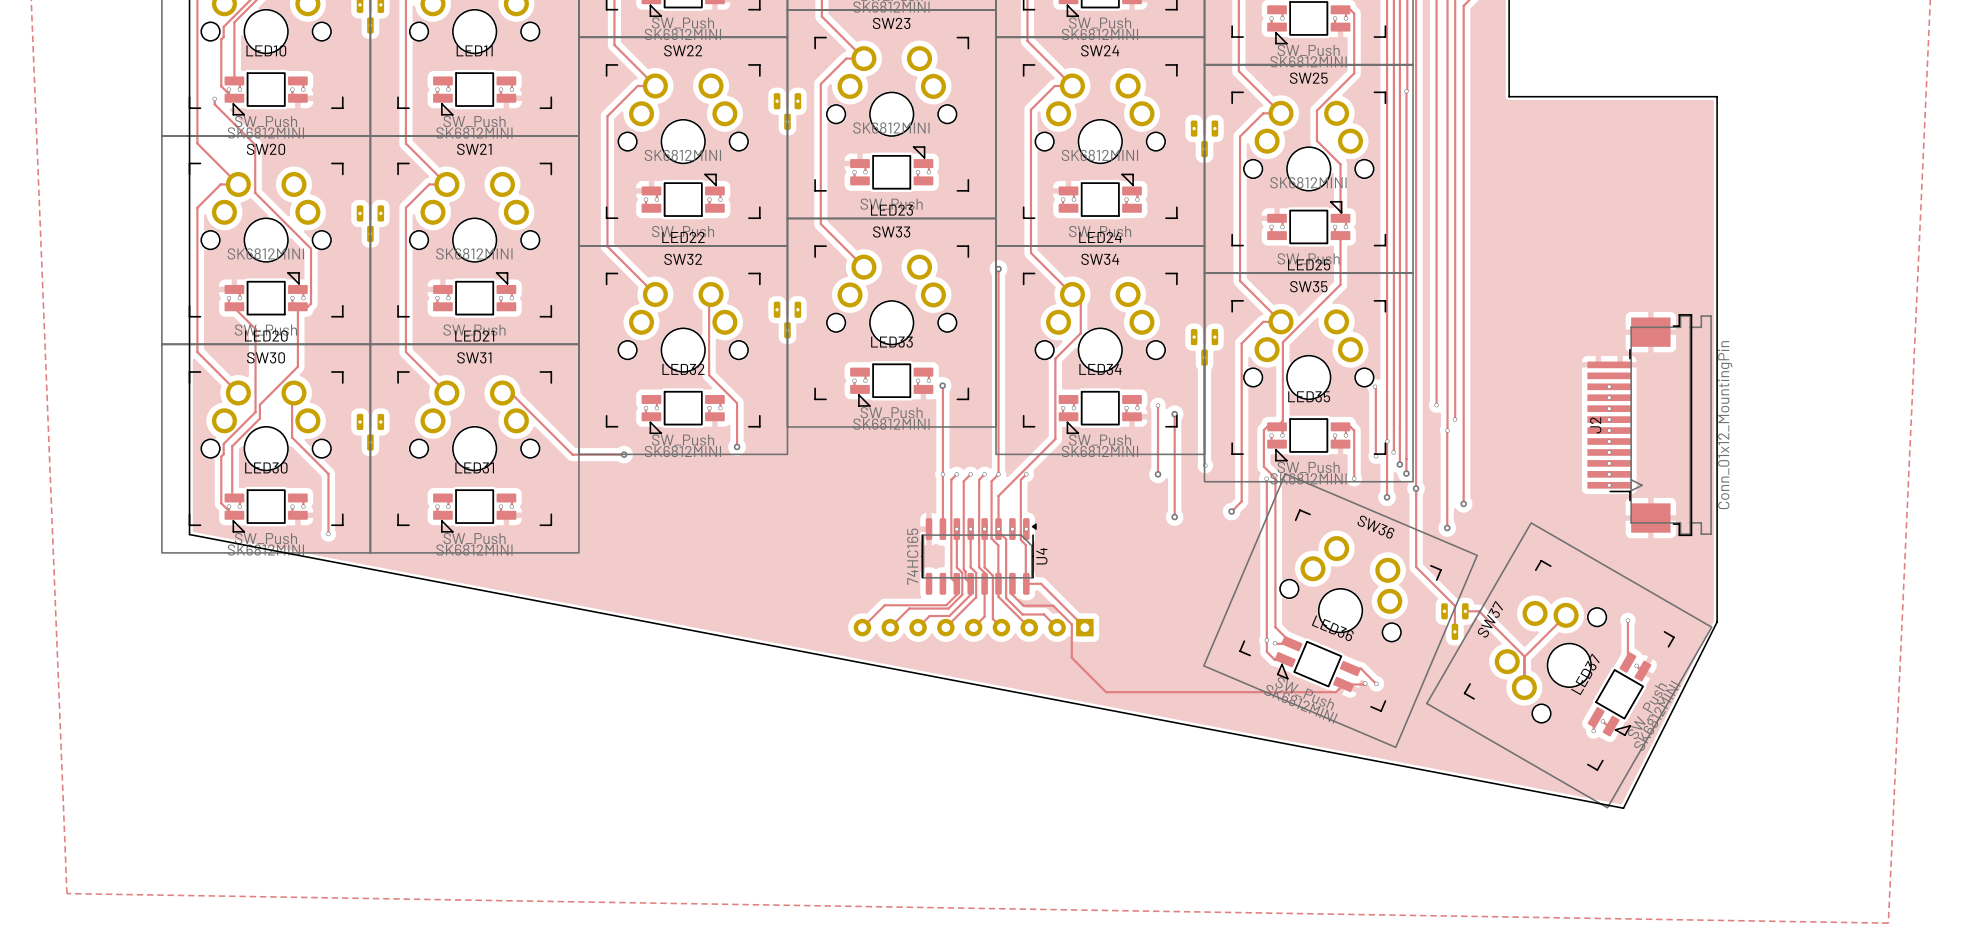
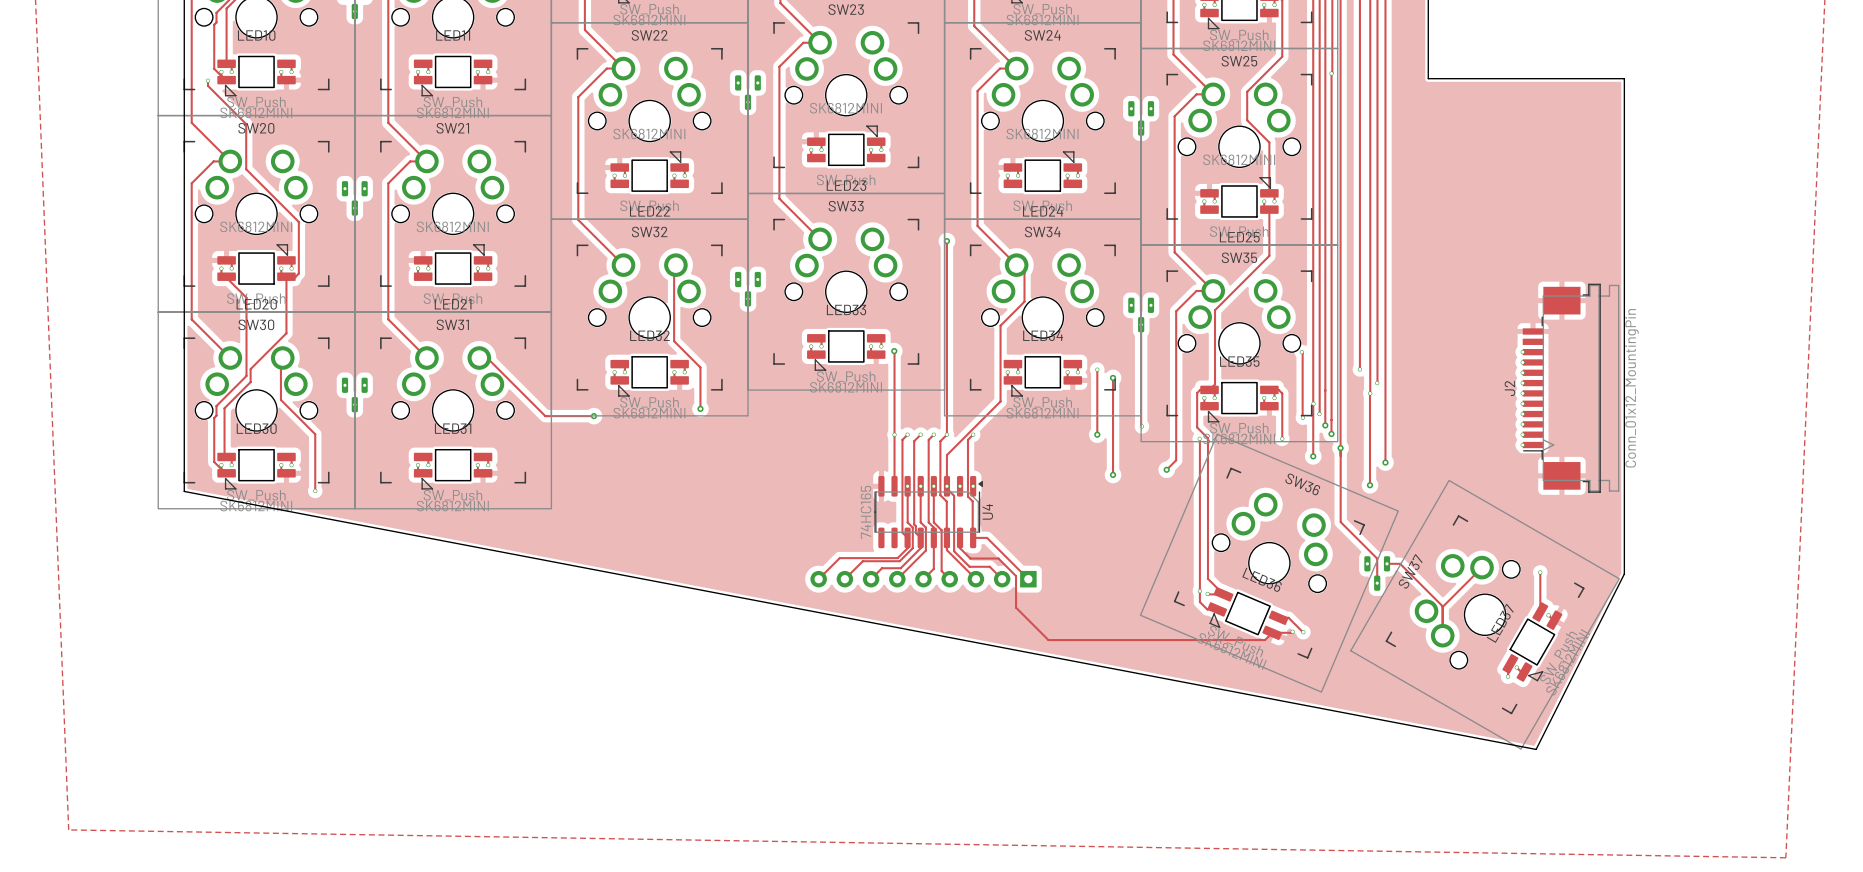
part: (1598, 364) -> none
part: (1598, 375) -> none
part: (1598, 386) -> none
part: (1598, 397) -> none
part: (1598, 408) -> none
part: (1598, 419) -> none
part: (1598, 430) -> none
part: (1598, 441) -> none
part: (1598, 452) -> none
part: (1598, 463) -> none
part: (1598, 474) -> none
part: (1598, 485) -> none

